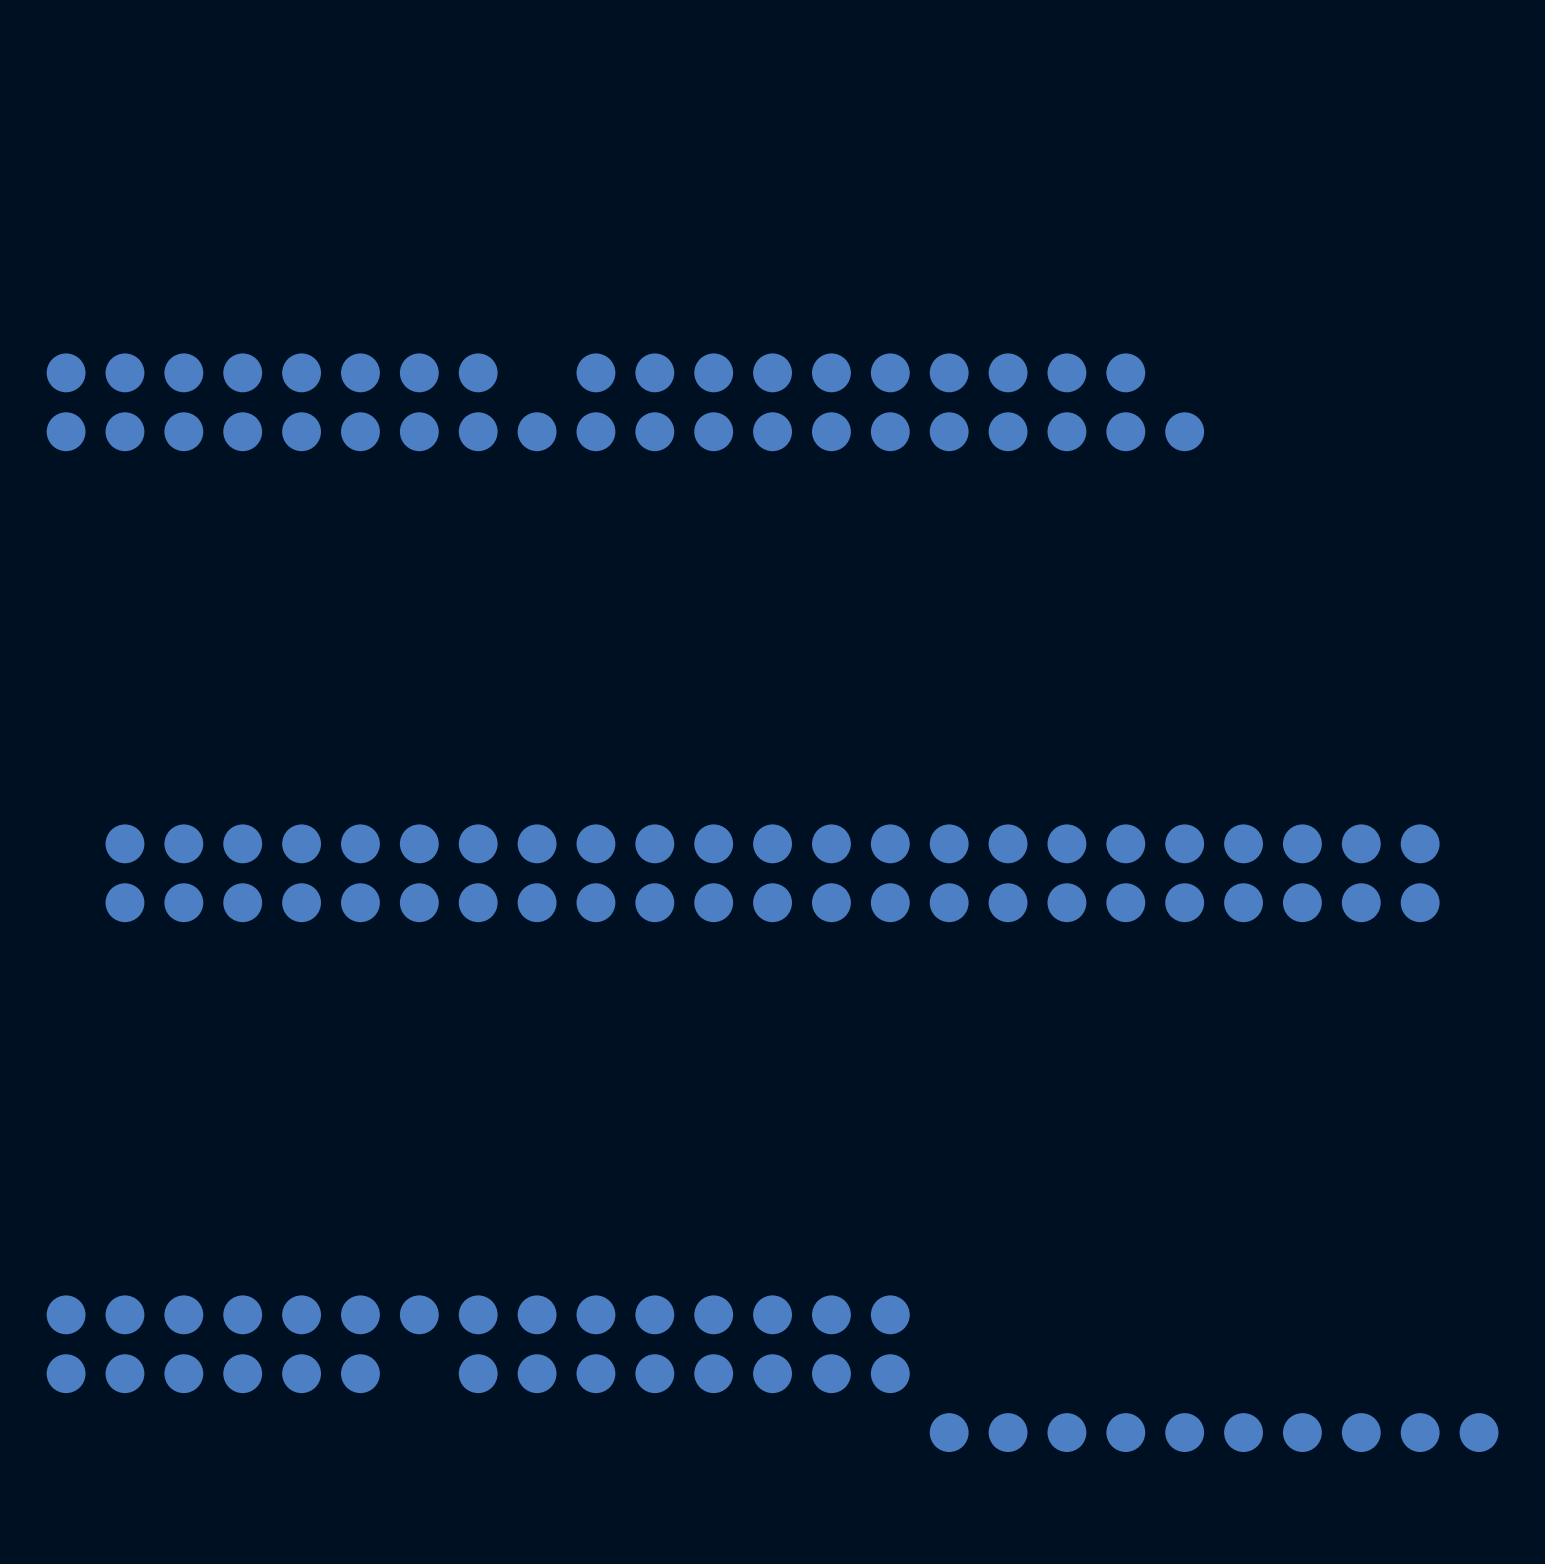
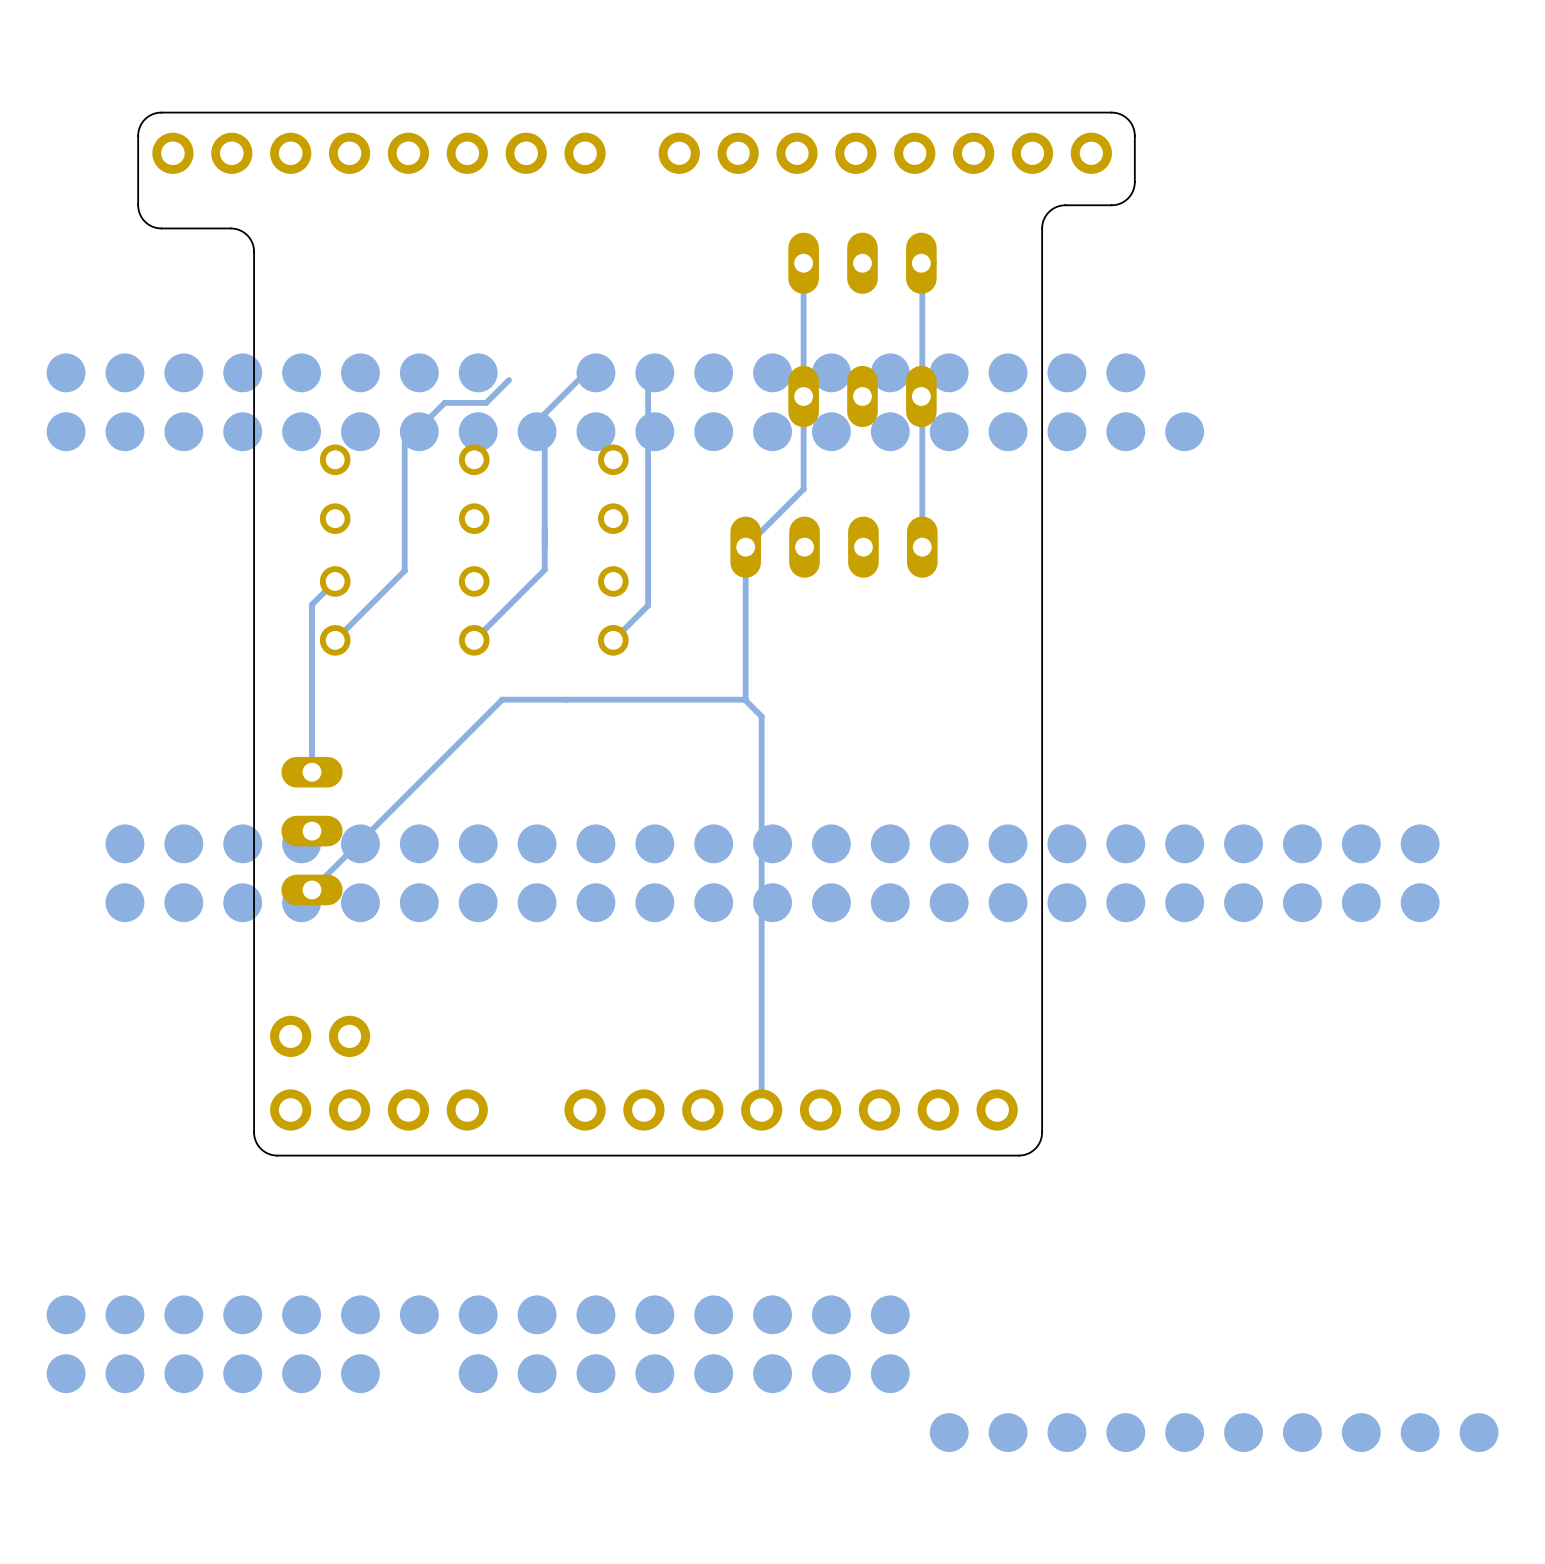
board edge: none -> (1111, 112) (161, 112) (149, 115) (142, 121) (138, 135) (138, 205) (142, 219) (149, 225) (158, 228) (236, 229) (247, 235) (253, 248) (254, 1132) (255, 1141) (263, 1150) (277, 1155) (1018, 1155) (1027, 1153) (1037, 1146) (1042, 1132) (1042, 225) (1046, 214) (1056, 207) (1114, 205) (1123, 202) (1131, 193) (1134, 182) (1134, 129) (1125, 117) (1111, 112)
part: none -> (378, 153)
part: none -> (885, 153)
track: none -> (803, 263) (803, 489) (745, 547) (744, 699)
part: none -> (862, 263)
track: none -> (934, 263) (921, 263) (922, 547)
track: none -> (509, 380) (486, 402) (444, 402) (404, 442) (404, 570) (335, 640)
track: none -> (578, 380) (544, 413) (544, 569) (474, 640)
track: none -> (648, 380) (648, 605) (613, 640)
part: none -> (862, 396)
part: none -> (335, 489)
part: none -> (474, 489)
part: none -> (613, 489)
part: none -> (833, 547)
track: none -> (335, 581) (312, 604) (312, 772)
part: none -> (335, 610)
part: none -> (474, 610)
part: none -> (613, 610)
track: none -> (744, 699) (761, 716) (761, 1109)
track: none -> (744, 699) (502, 699) (312, 889)
part: none -> (312, 831)
part: none -> (320, 1036)
part: none -> (378, 1109)
part: none -> (791, 1109)

